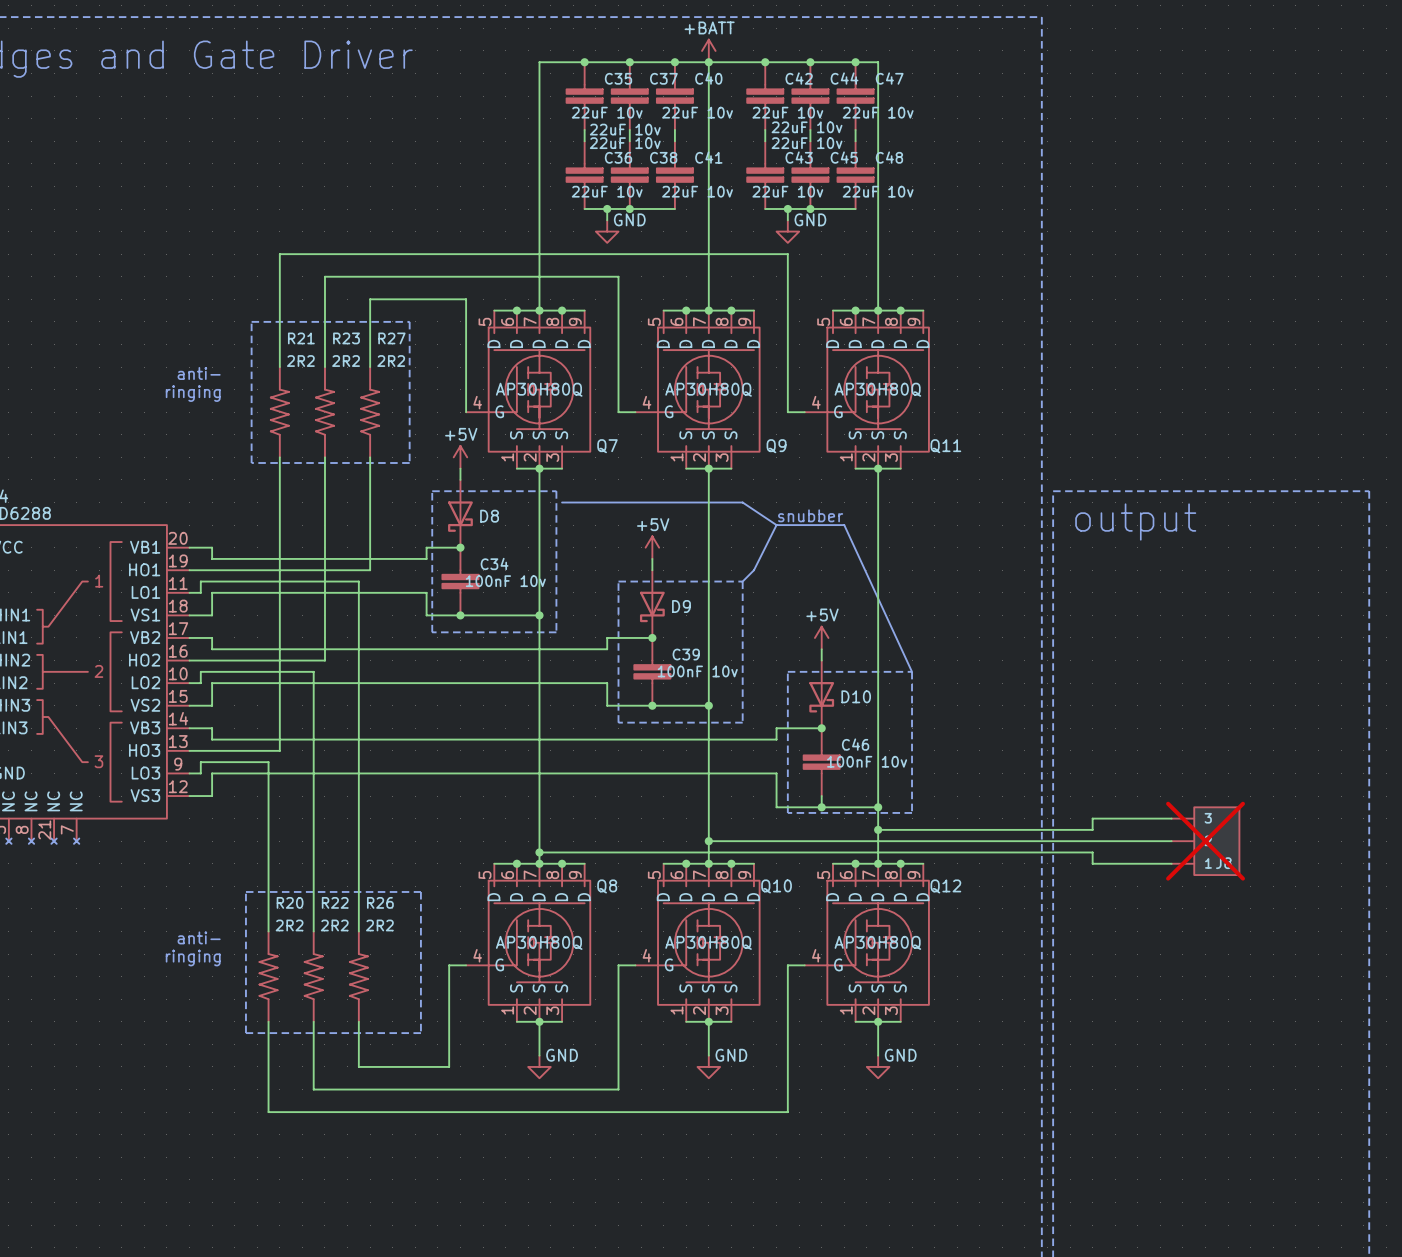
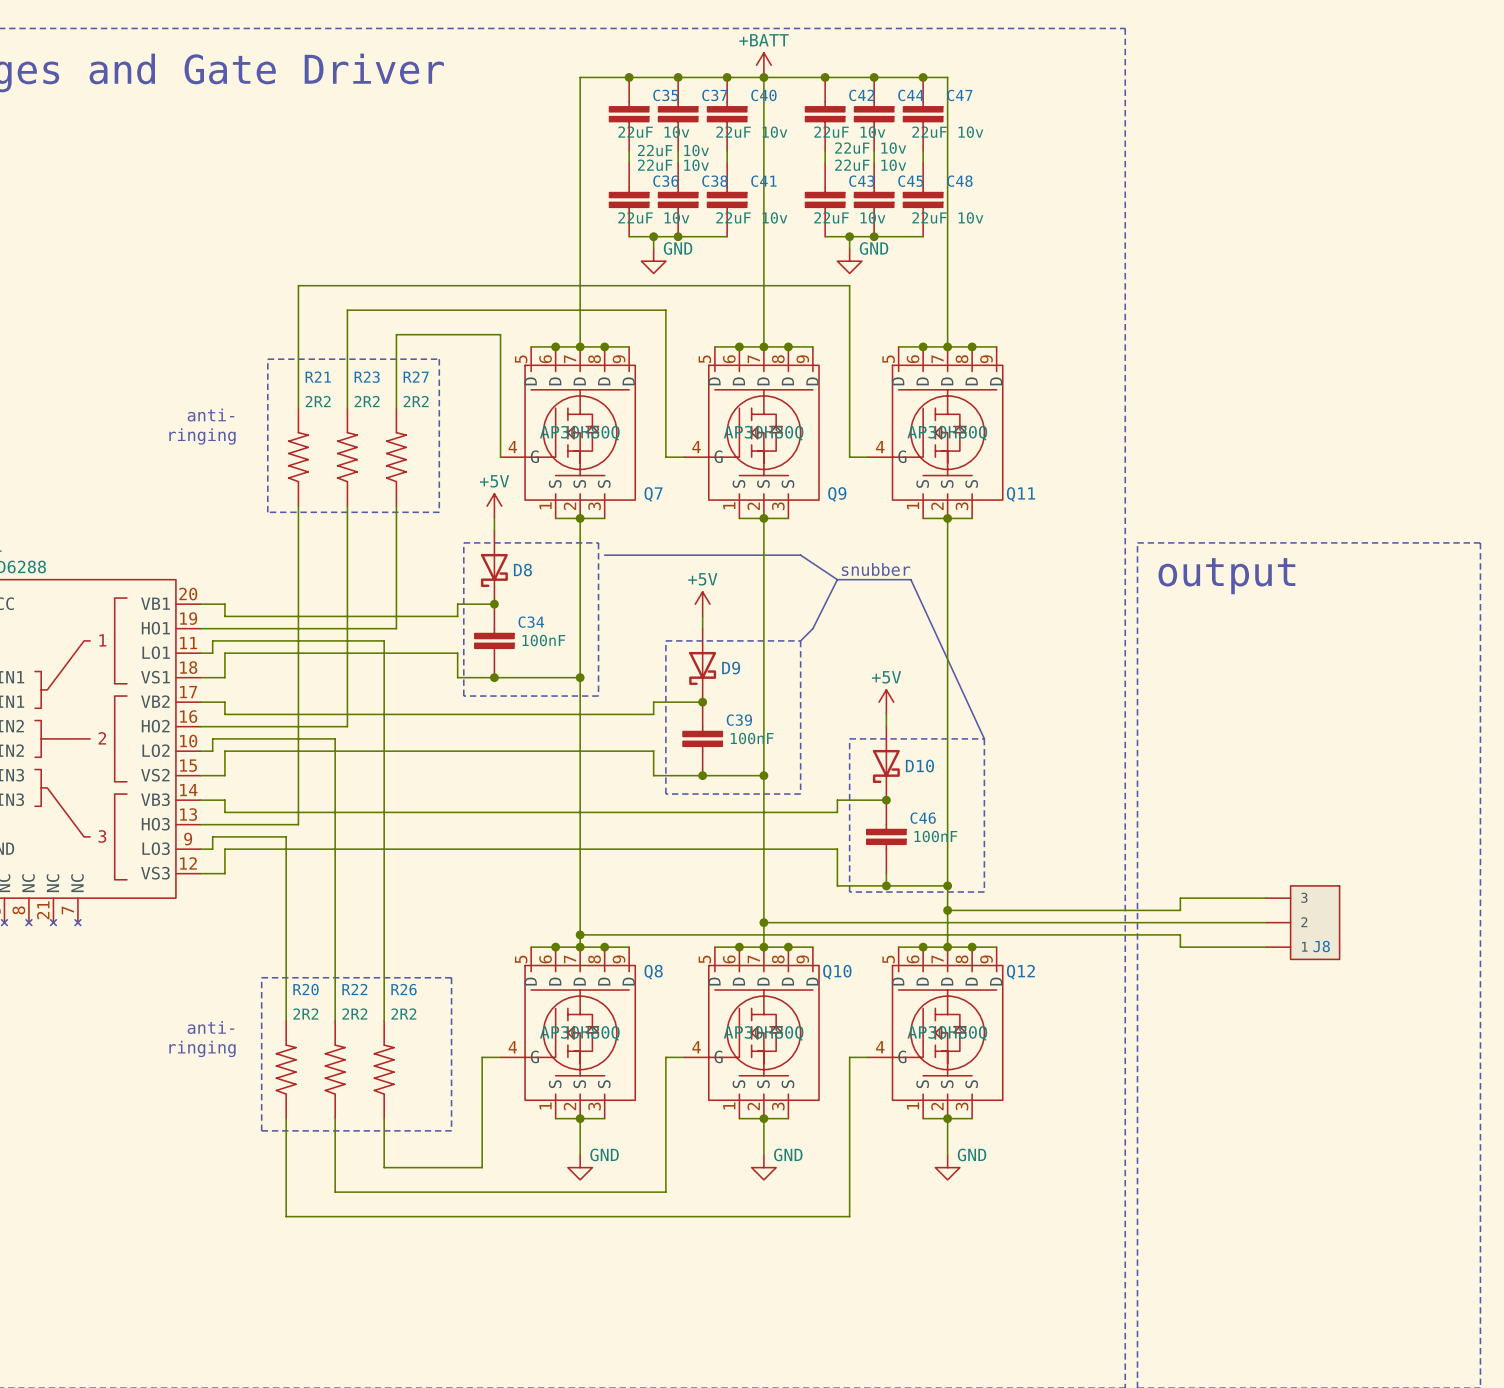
C34 value: 100nF 10v (505, 581) -> 100nF (543, 640)
C39 value: 100nF 10v (697, 671) -> 100nF (752, 738)
C46 value: 100nF 10v (867, 761) -> 100nF (935, 836)
J8 do-not-place cross: (1205, 841) -> none

